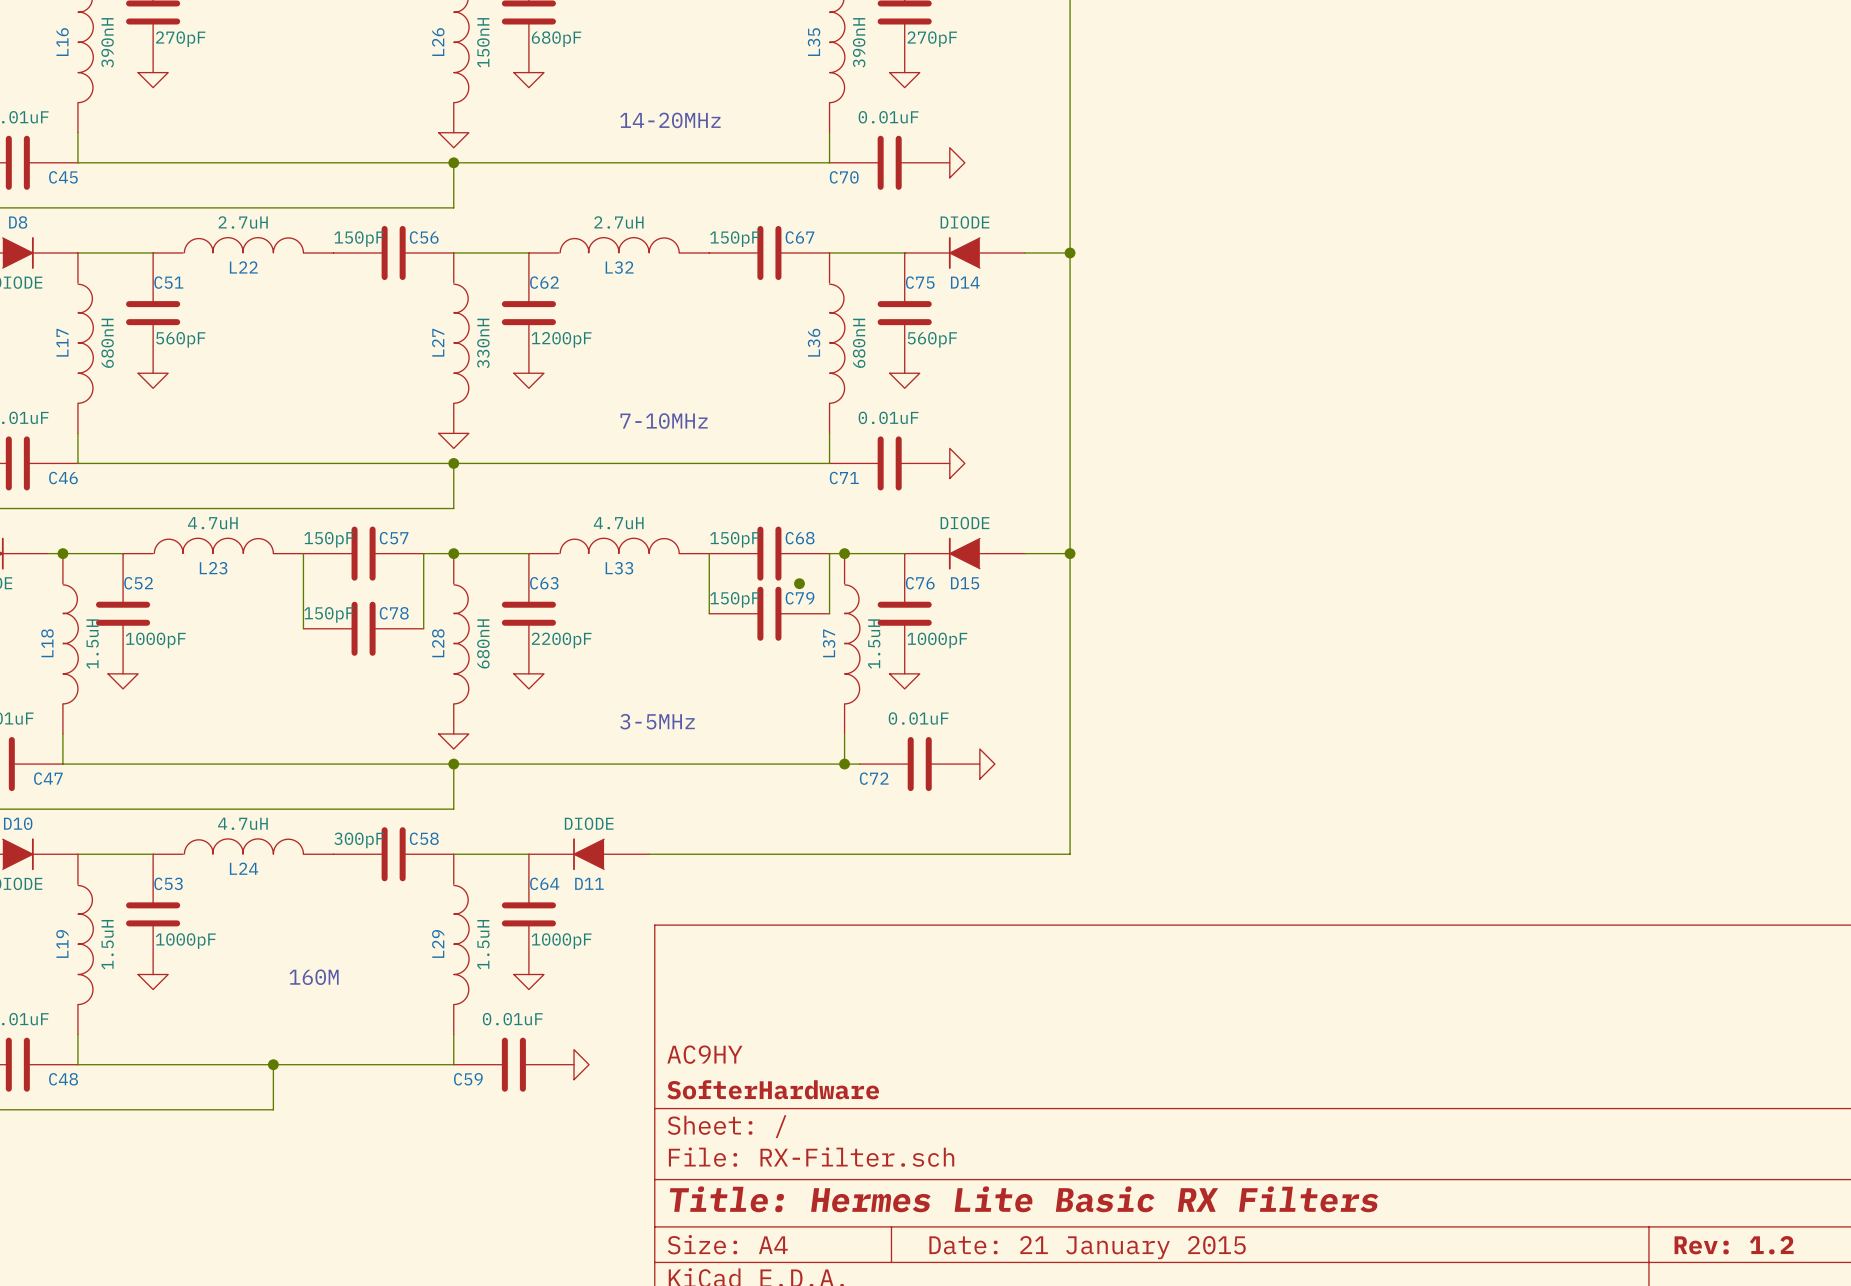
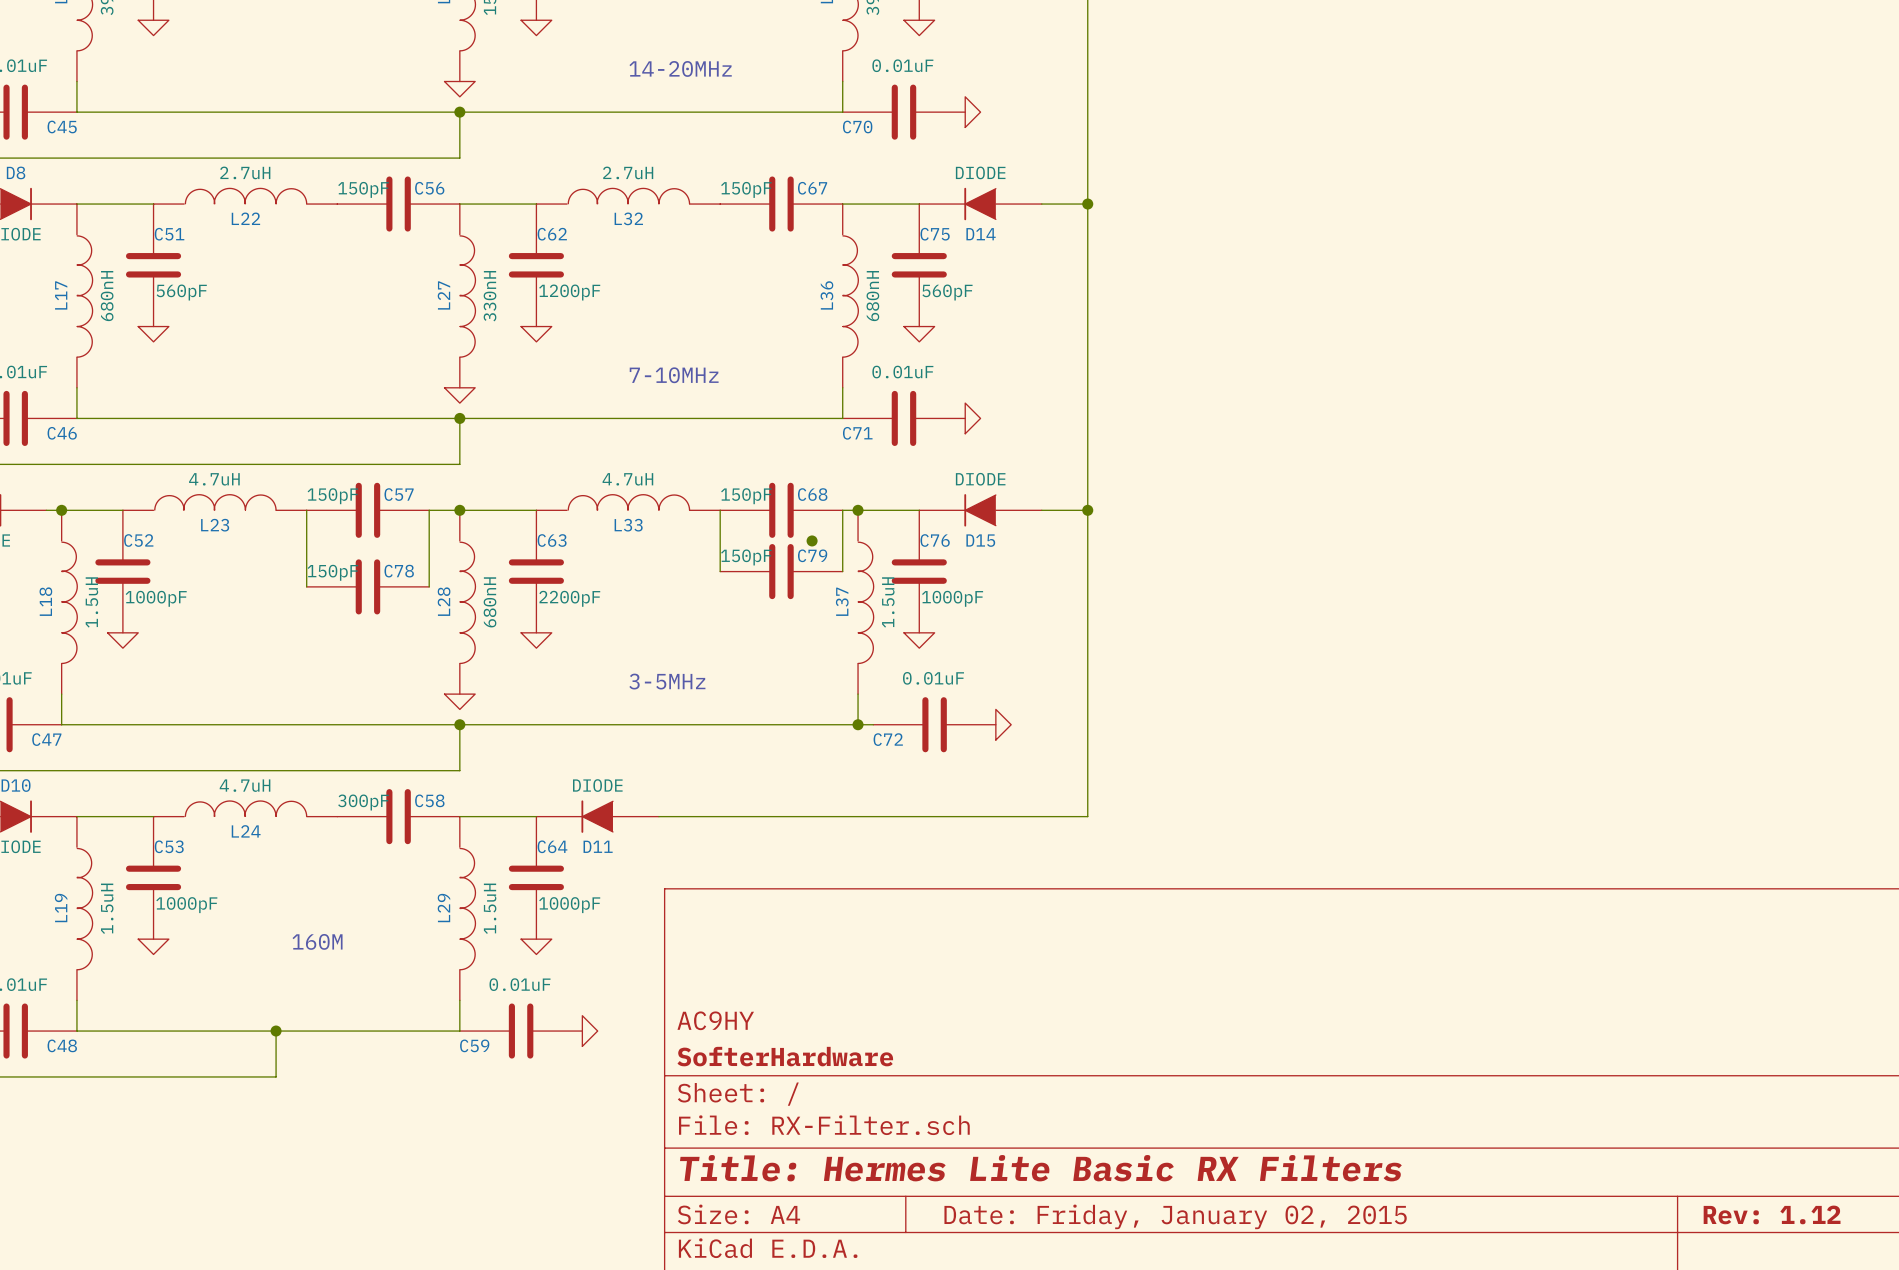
title block: Rev: 1.2 (1734, 1245) -> Rev: 1.12 (1772, 1214)
title block: Date: 21 January 2015 (1087, 1247) -> Date: Friday, January 02, 2015 (1175, 1216)

